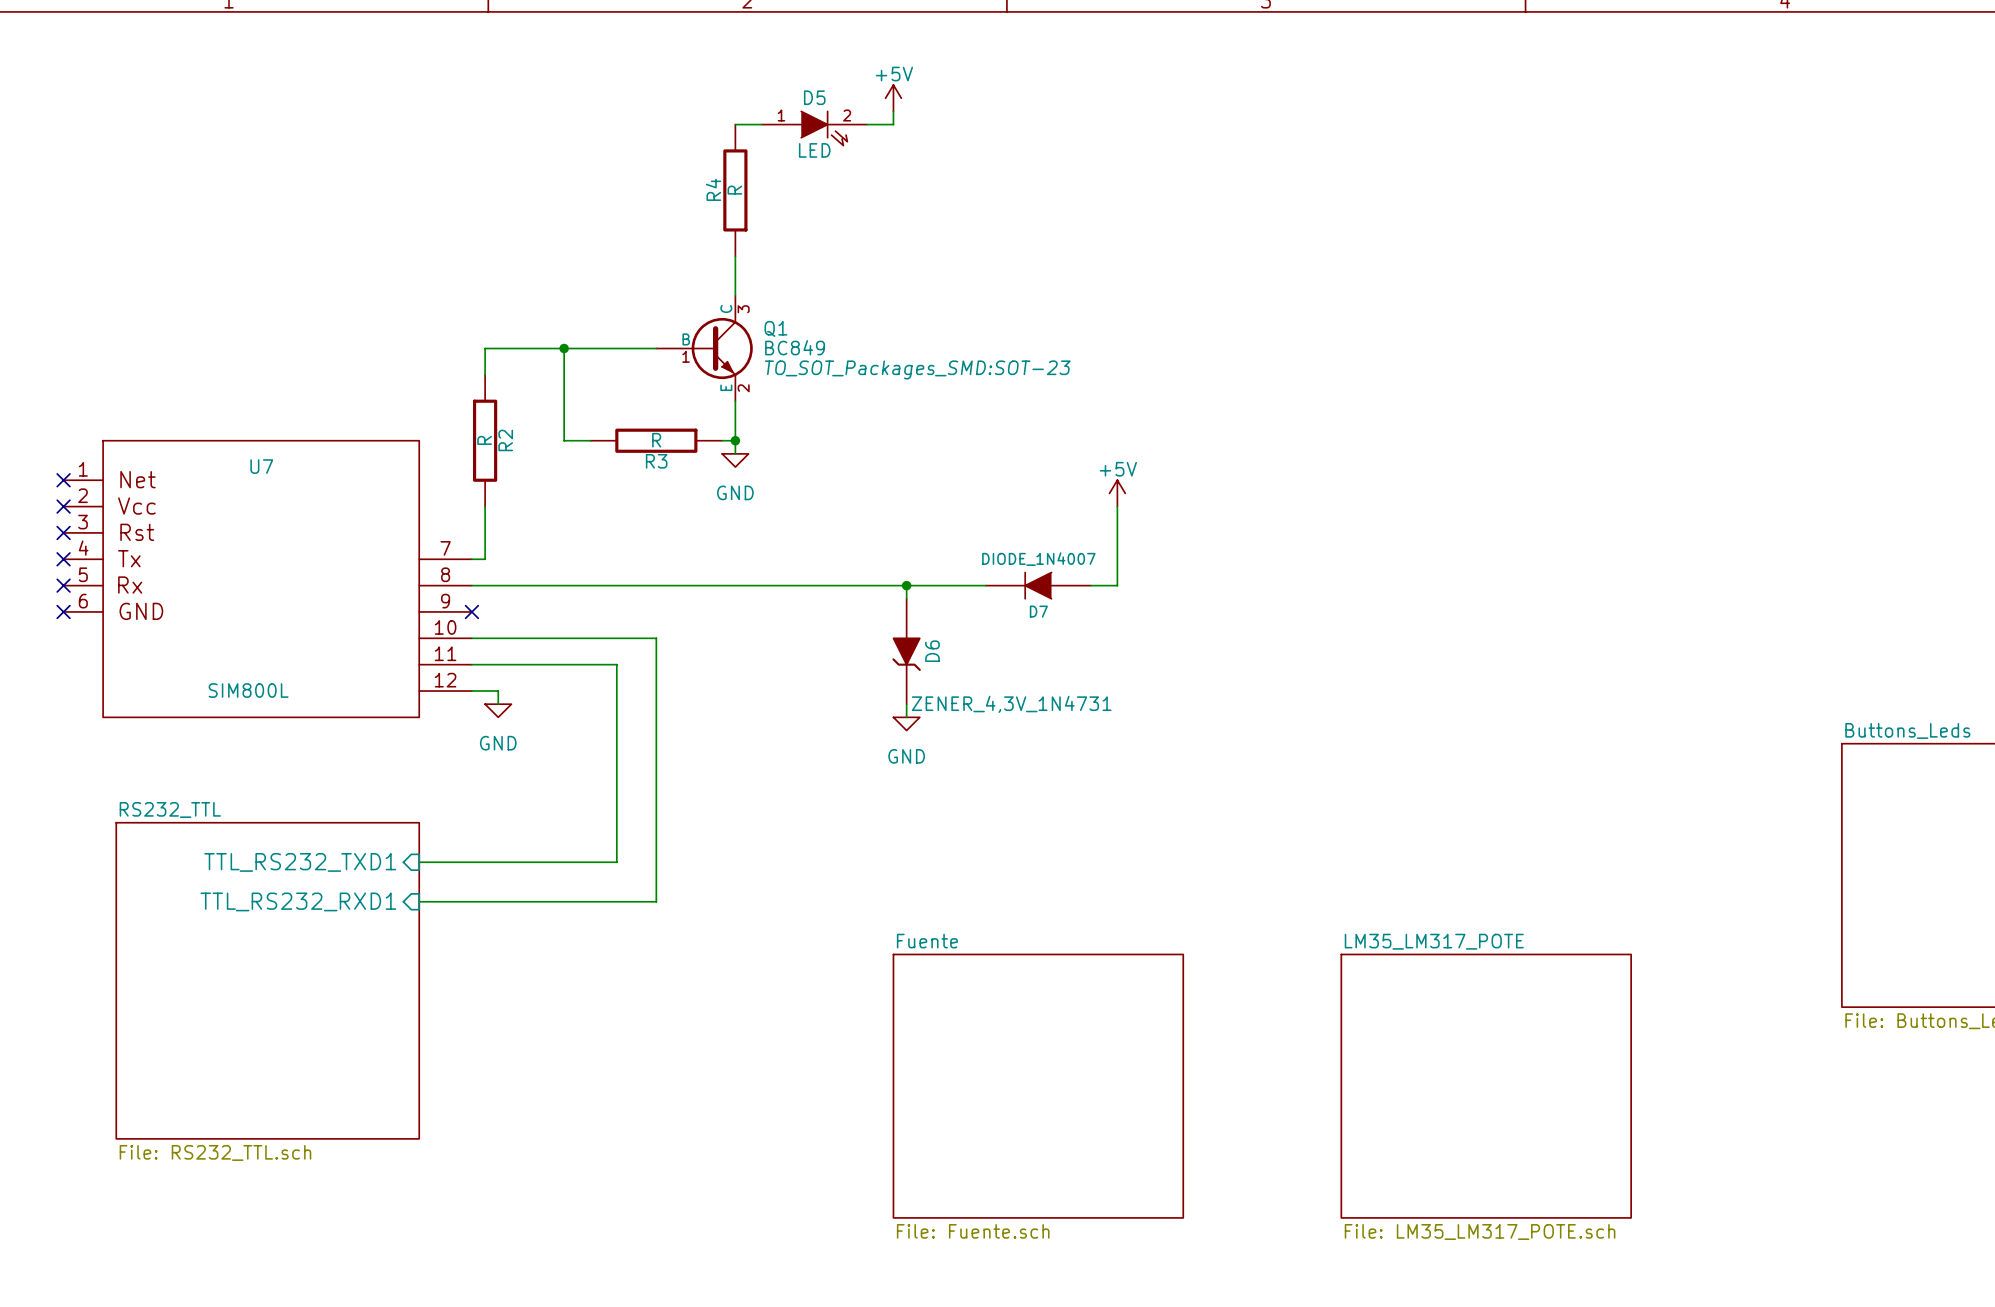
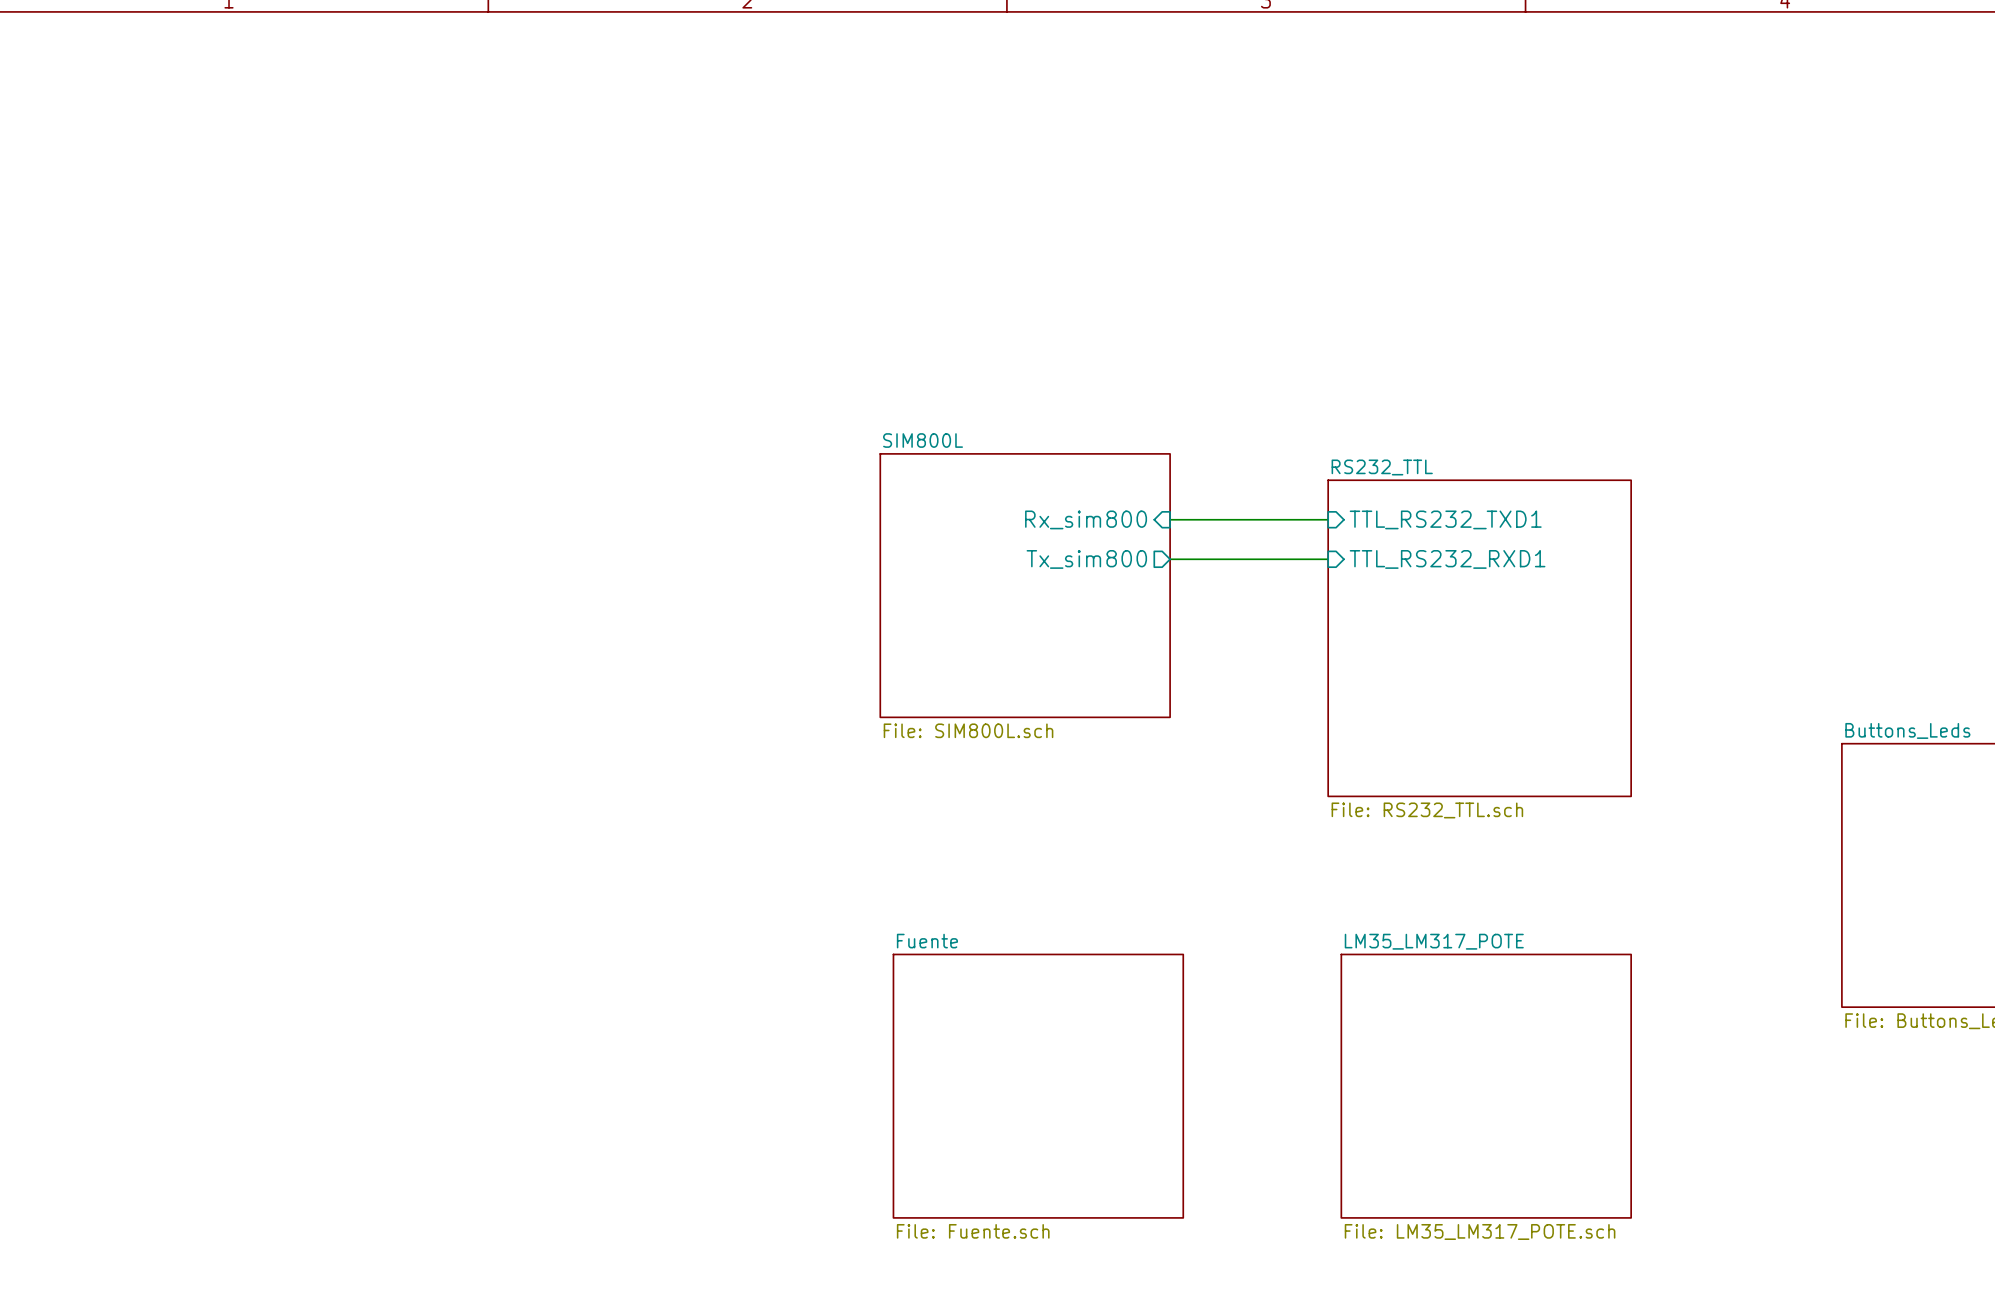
power symbol: +5V (893, 98) -> none
wire: (893, 111) (893, 124) (867, 124) -> none
wire: (735, 124) (761, 124) -> none
D5: LED (814, 128) -> none
R4: R (735, 190) -> none
wire: (735, 256) (735, 295) -> none
wire: (564, 348) (564, 440) (590, 440) -> none
junction: (564, 348) -> none
wire: (656, 348) (485, 348) (485, 374) -> none
Q1: BC849 (704, 348) -> none
wire: (735, 401) (735, 453) -> none
R2: R (485, 440) -> none
R3: R (656, 440) -> none
wire: (722, 440) (735, 440) -> none
junction: (735, 440) -> none
power symbol: GND (735, 460) -> none
no-connect mark: (63, 480) -> none
power symbol: +5V (1117, 493) -> none
no-connect mark: (63, 506) -> none
wire: (485, 506) (485, 559) (471, 559) -> none
wire: (1117, 506) (1117, 585) (1091, 585) -> none
sheet pin: none -> Rx_sim800 (1086, 519)
wire: none -> (1170, 519) (1328, 519)
sheet pin: none -> TTL_RS232_TXD1 (1445, 519)
no-connect mark: (63, 532) -> none
no-connect mark: (63, 559) -> none
sheet pin: none -> Tx_sim800 (1086, 559)
wire: none -> (1170, 559) (1328, 559)
sheet pin: none -> TTL_RS232_RXD1 (1447, 559)
U7: SIM800L (267, 579) -> none
no-connect mark: (63, 585) -> none
wire: (471, 585) (985, 585) -> none
wire: (906, 585) (906, 598) -> none
junction: (906, 585) -> none
sheet SIM800L: none -> File: SIM800L.sch (1025, 585)
D7: DIODE_1N4007 (1038, 585) -> none
no-connect mark: (63, 611) -> none
no-connect mark: (471, 611) -> none
wire: (471, 638) (656, 638) (656, 901) (419, 901) -> none
D6: ZENER_4,3V_1N4731 (906, 651) -> none
wire: (471, 664) (616, 664) (616, 862) (419, 862) -> none
wire: (471, 691) (498, 691) (498, 704) -> none
wire: (906, 704) (906, 717) -> none
power symbol: GND (498, 710) -> none
power symbol: GND (906, 723) -> none
sheet pin: TTL_RS232_TXD1 (300, 862) -> none
sheet pin: TTL_RS232_RXD1 (298, 901) -> none
sheet RS232_TTL position: (267, 980) -> (1479, 638)

